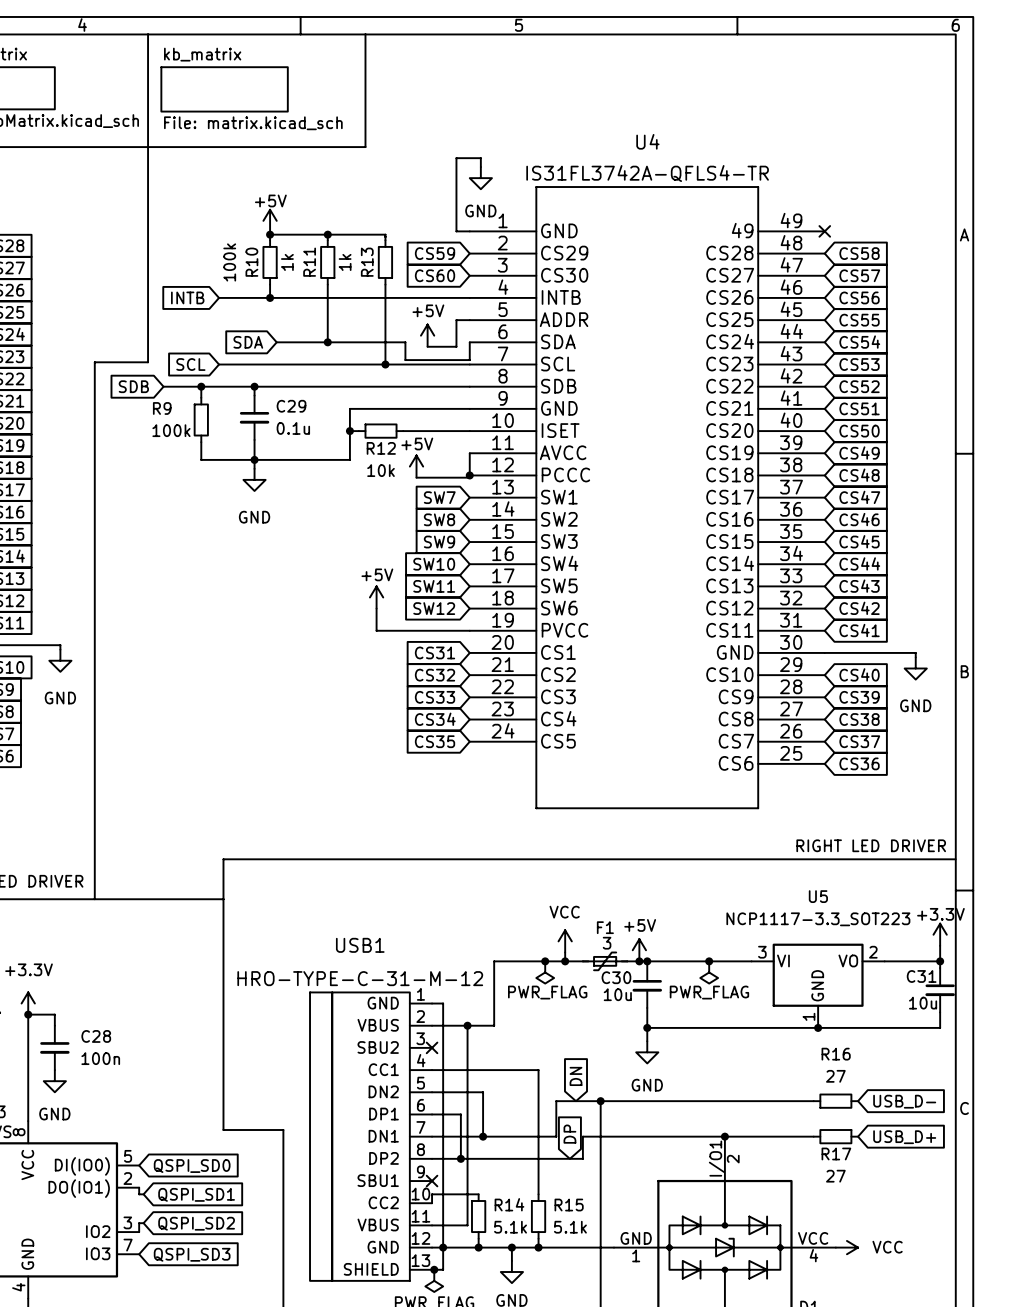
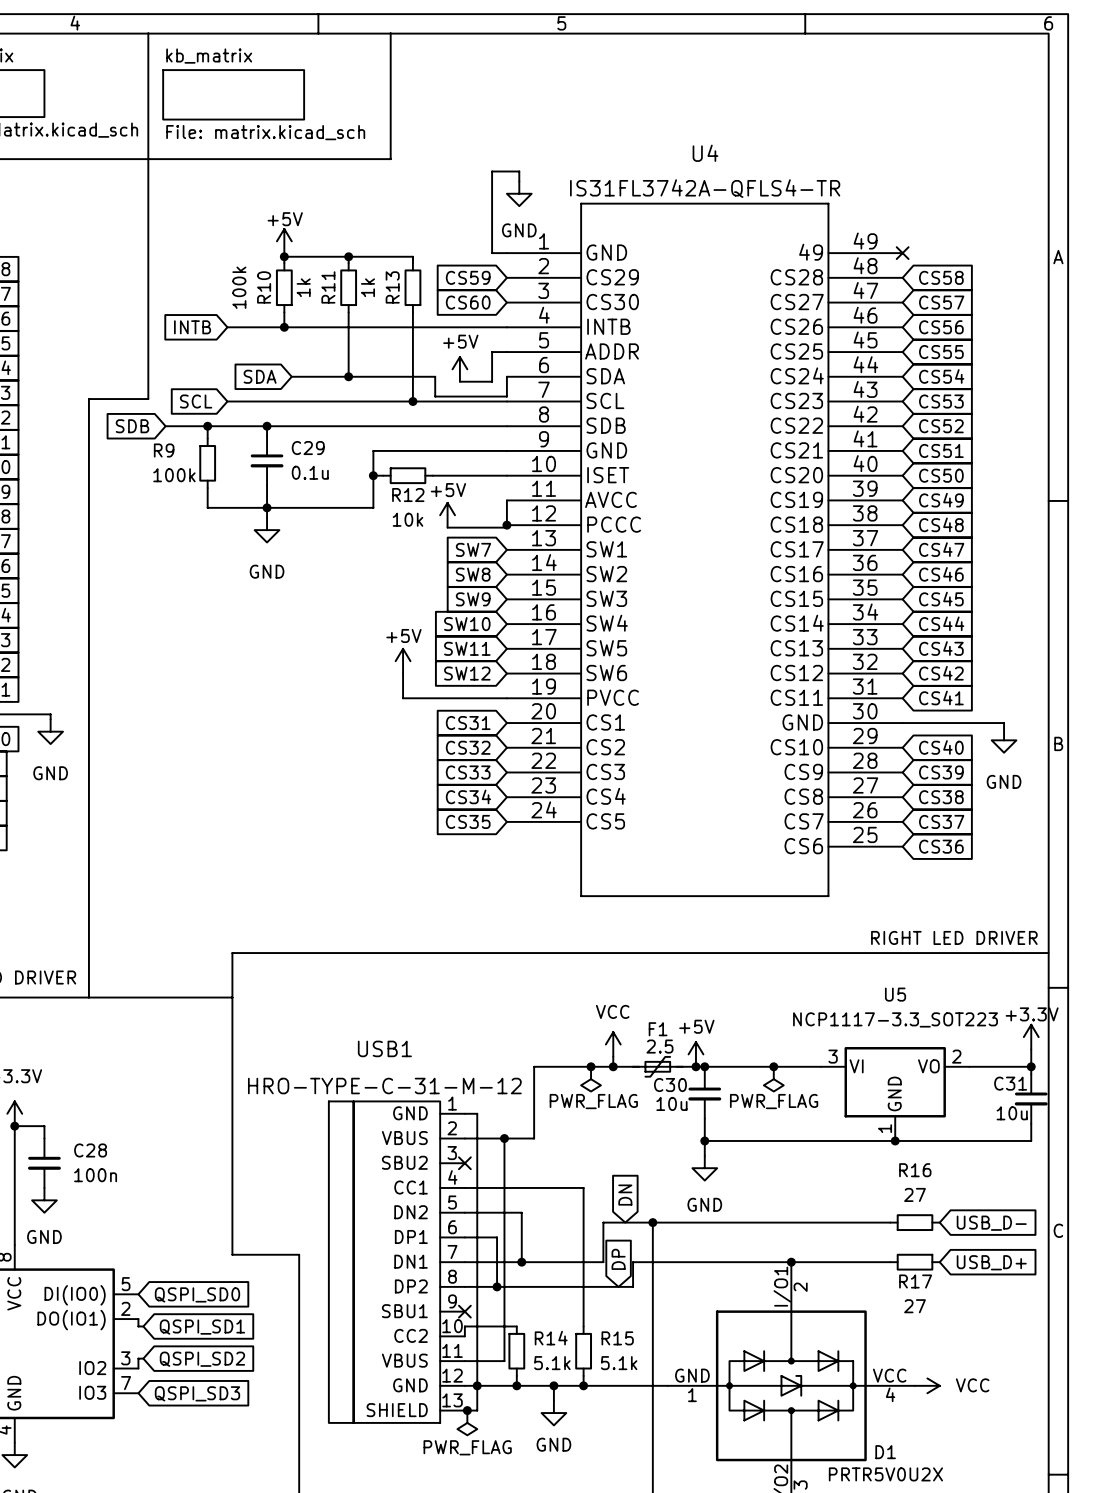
F1 value: 3 (607, 943) -> 2.5 (659, 1046)

